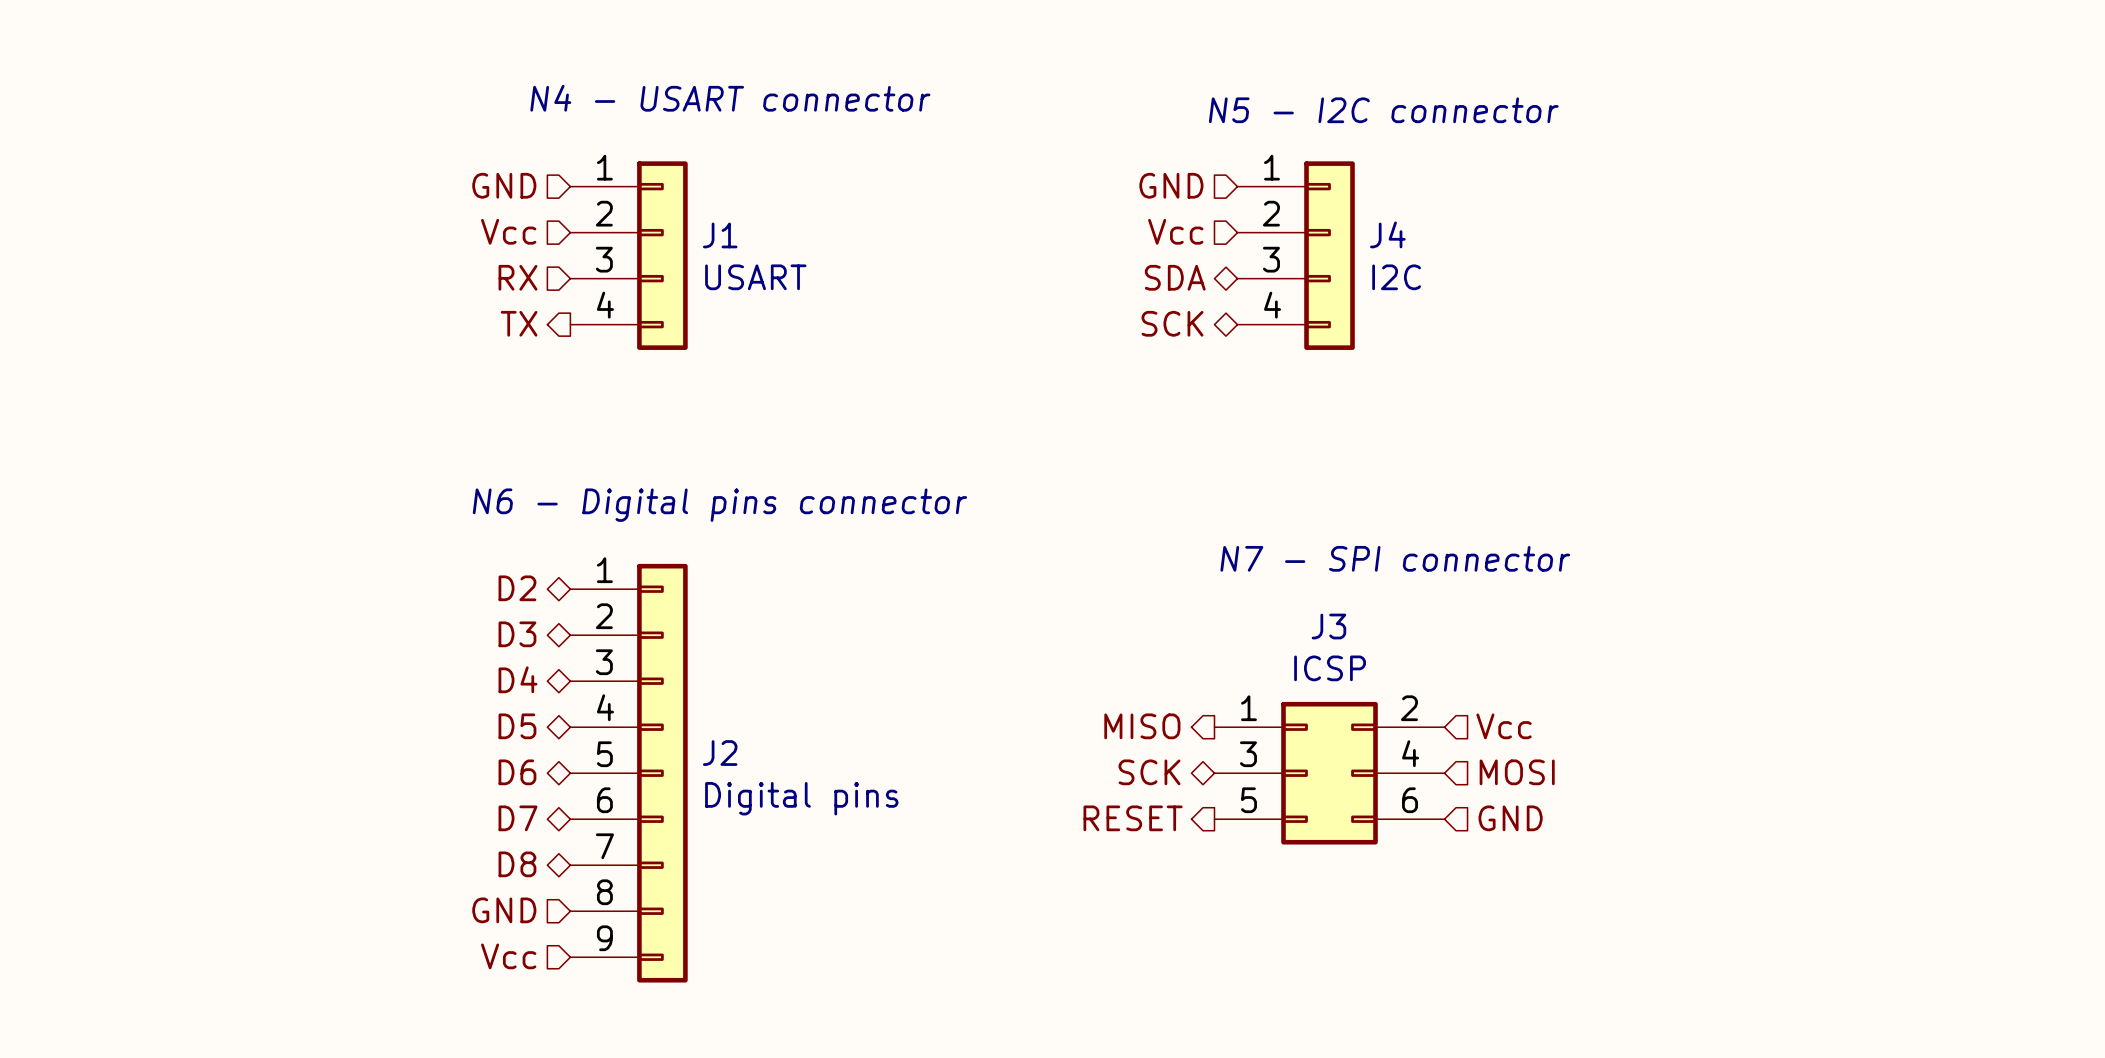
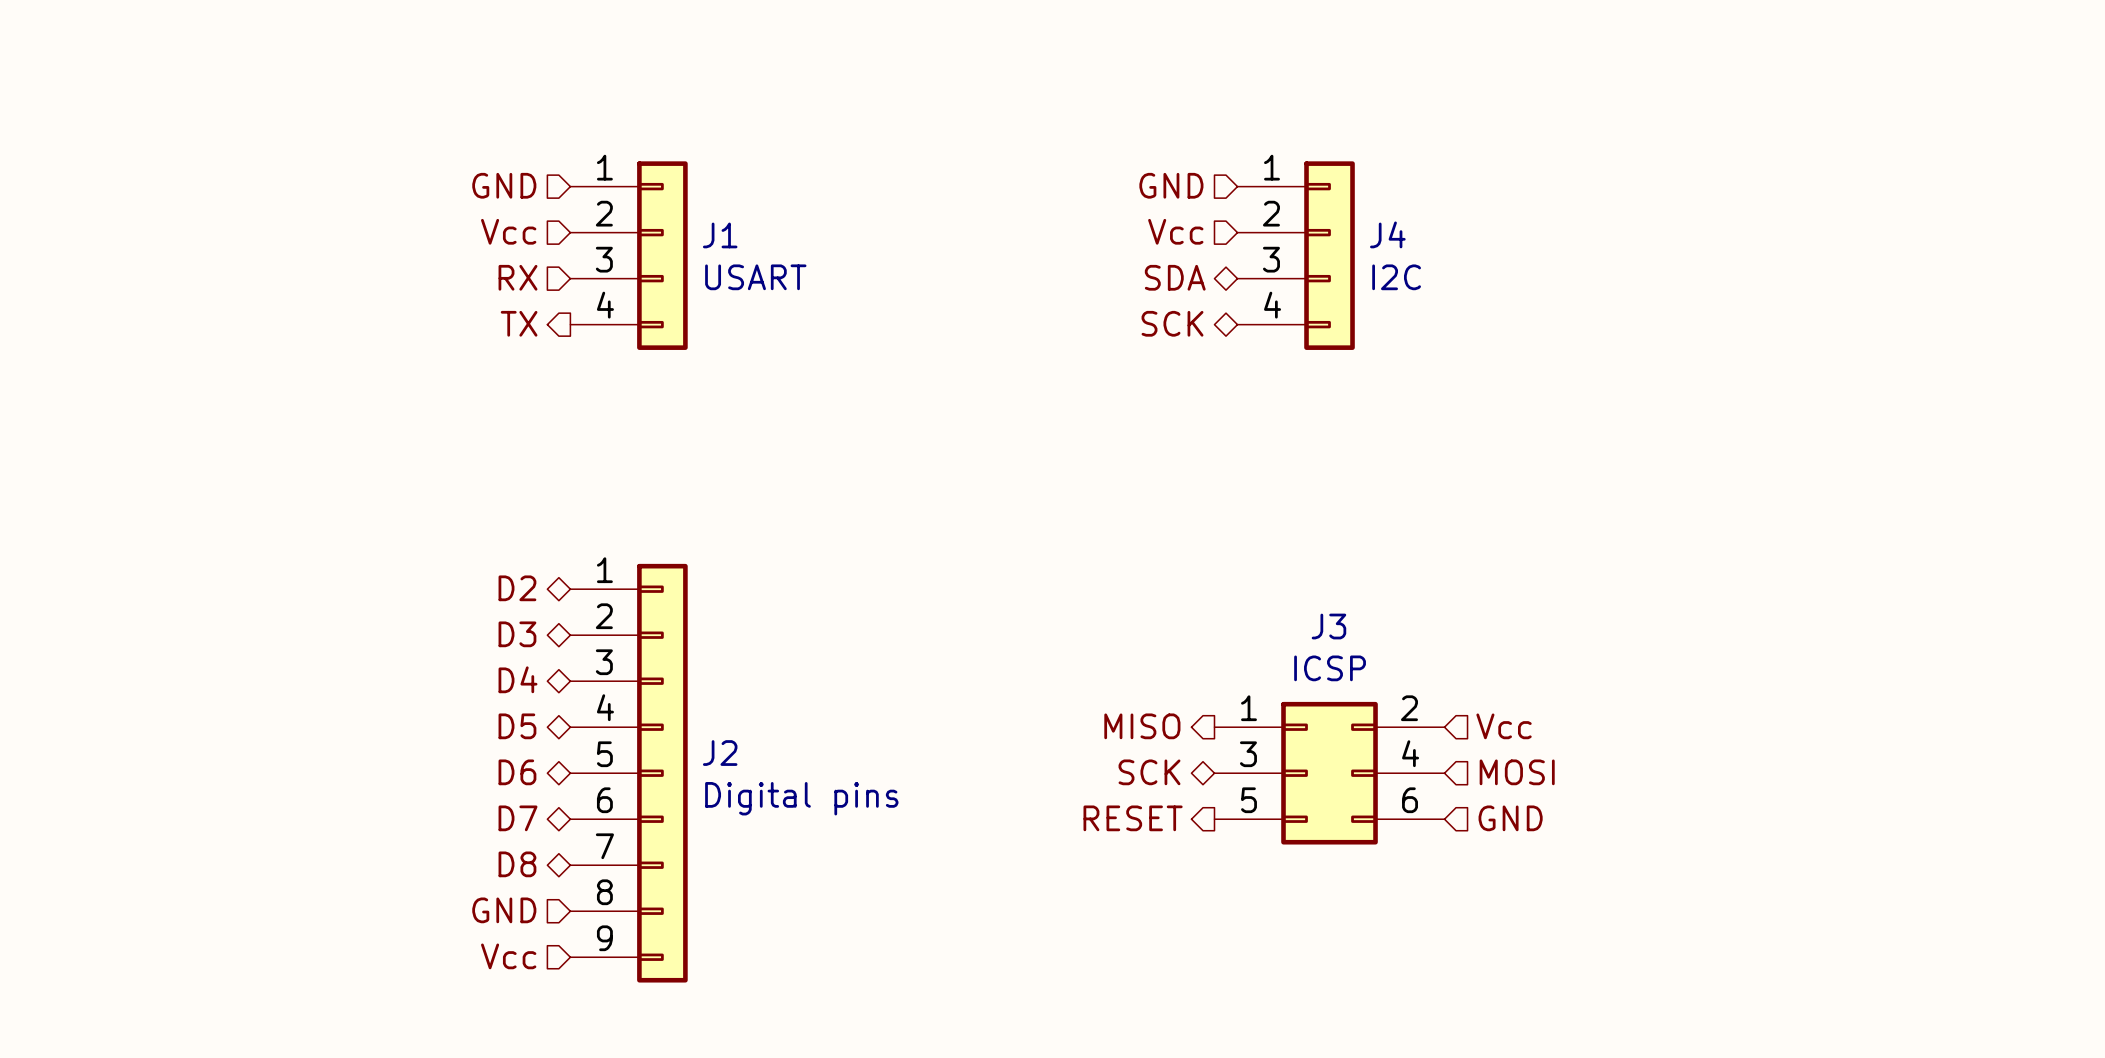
text: N4 - USART connector (730, 98) -> none
text: N5 - I2C connector (1383, 110) -> none
text: N6 - Digital pins connector (719, 505) -> none
text: N7 - SPI connector (1395, 558) -> none

